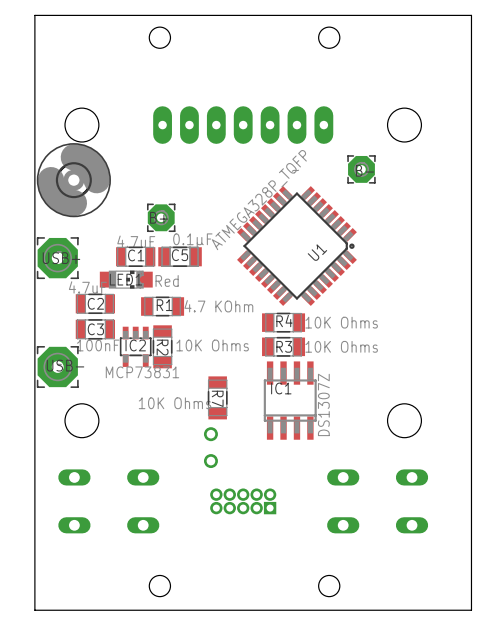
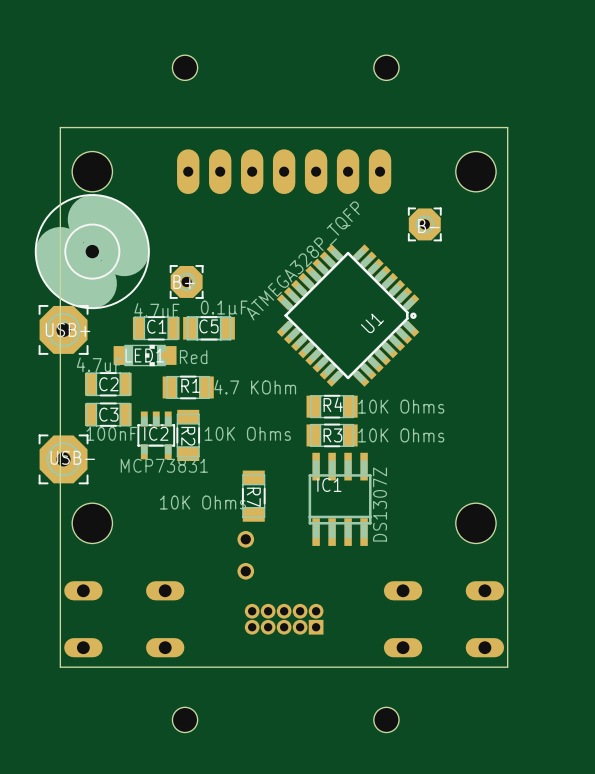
board edge: (34, 15) (471, 15) (471, 610) (34, 610) (34, 15) -> (60, 127) (60, 667) (507, 667) (507, 127) (60, 127)
part: (73, 180) -> none
part: none -> (92, 251)

